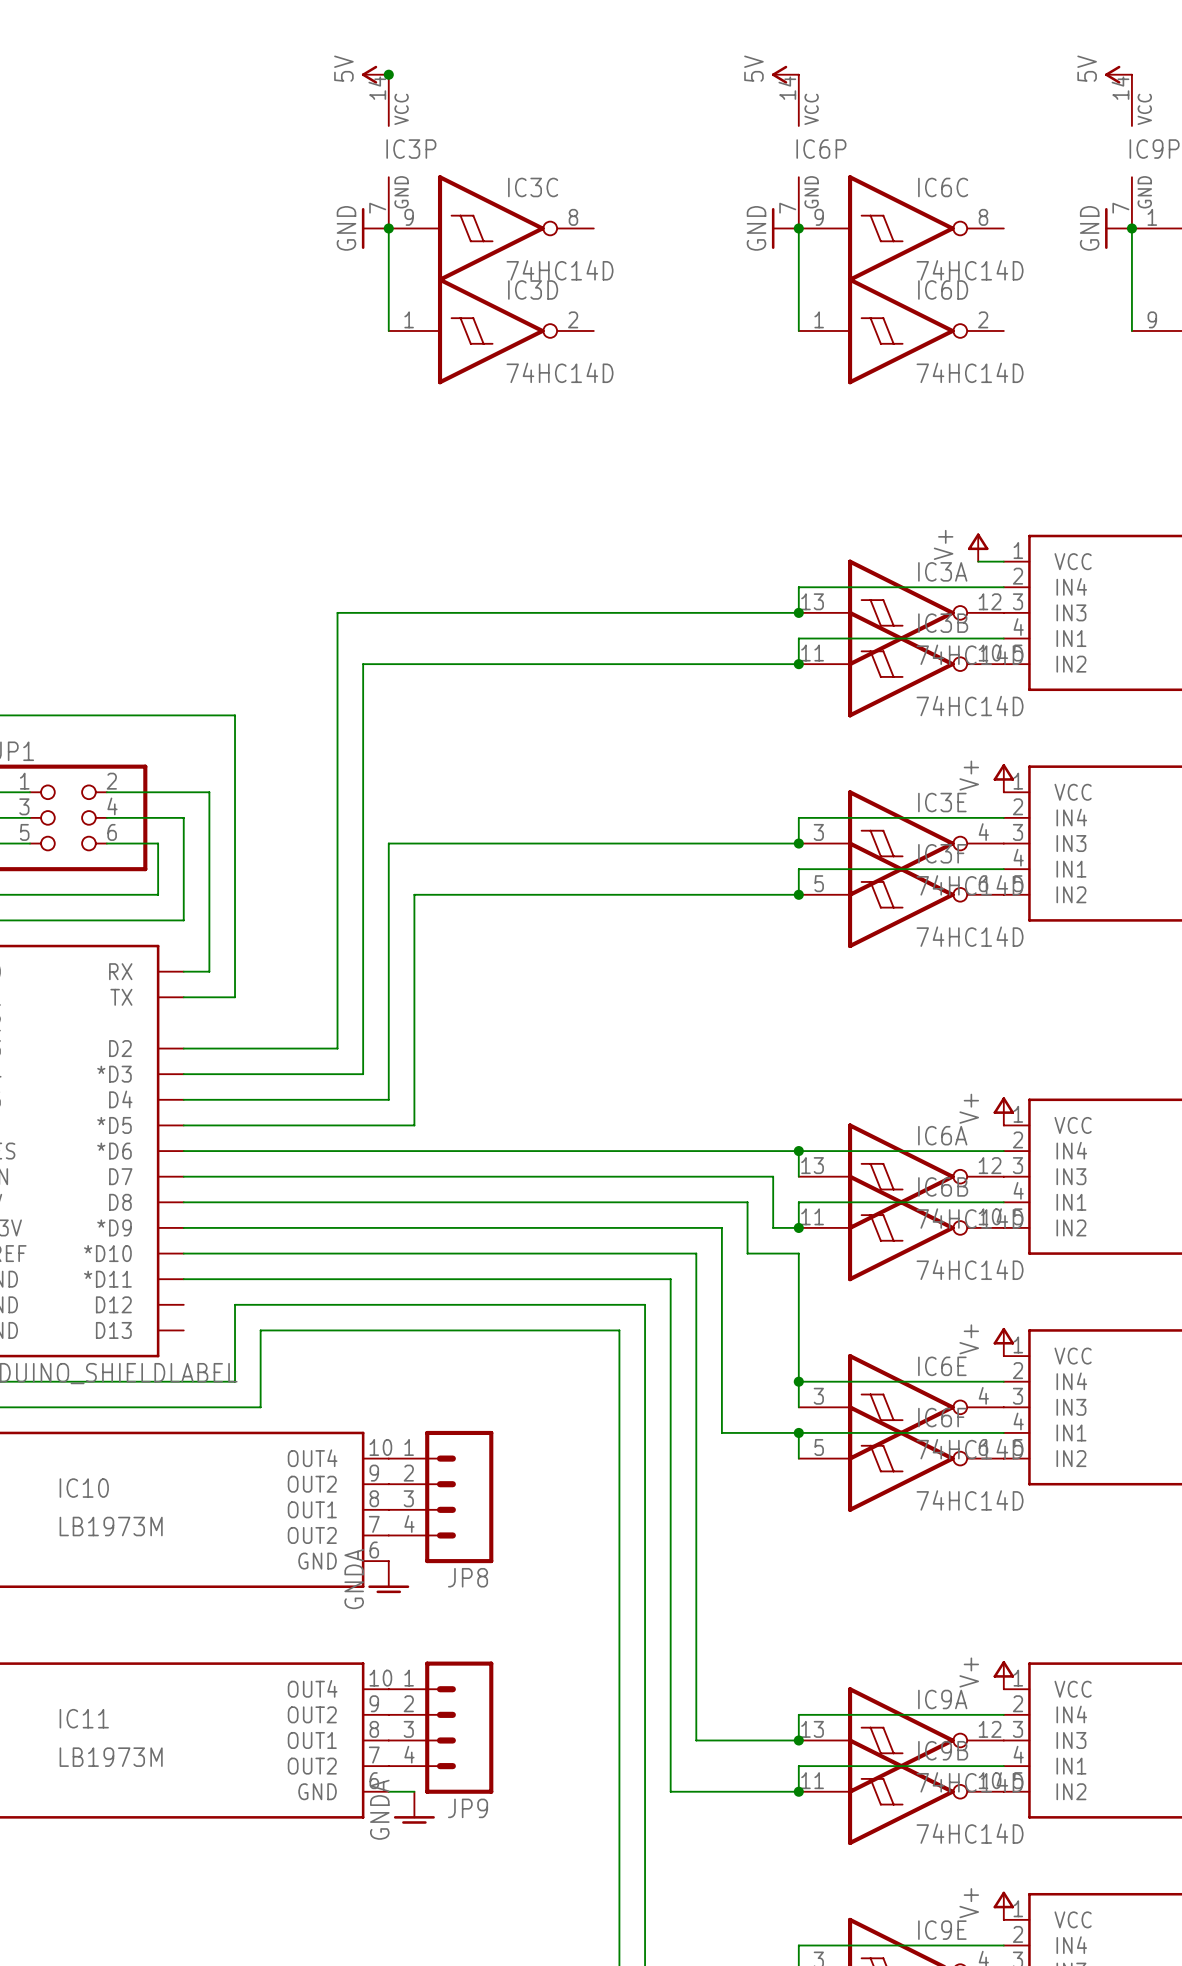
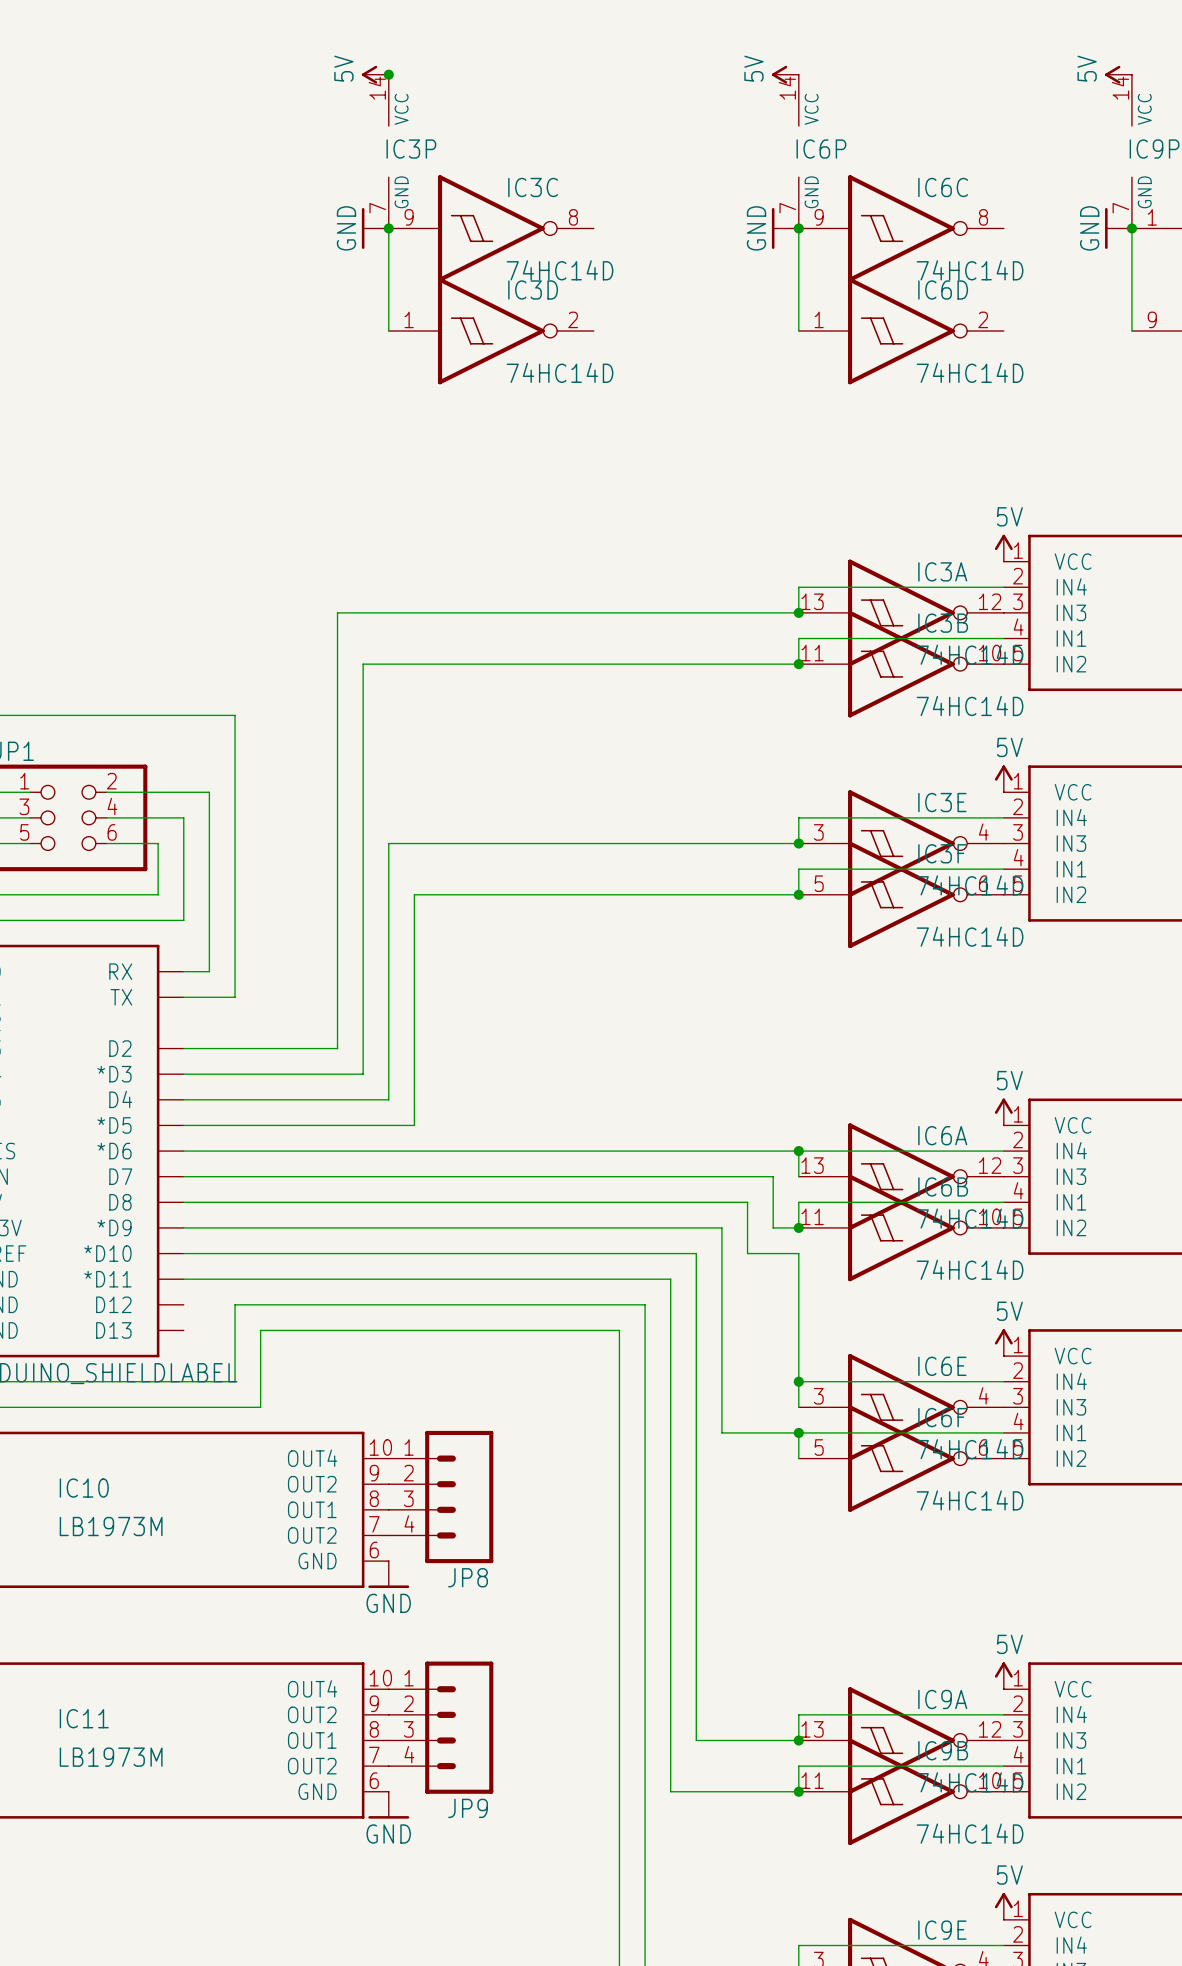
power symbol: V+ (978, 547) -> none
power symbol: none -> 5V (1003, 548)
wire: (978, 561) (1003, 561) -> none
power symbol: V+ (1003, 778) -> 5V (1003, 778)
power symbol: V+ (1003, 1111) -> 5V (1003, 1111)
power symbol: V+ (1003, 1341) -> 5V (1003, 1342)
power symbol: GNDA (388, 1577) -> GND (388, 1574)
power symbol: V+ (1003, 1675) -> 5V (1003, 1675)
wire: (388, 1791) (414, 1791) -> none
power symbol: none -> GND (388, 1805)
power symbol: GNDA (414, 1807) -> none
power symbol: V+ (1003, 1905) -> 5V (1003, 1906)

